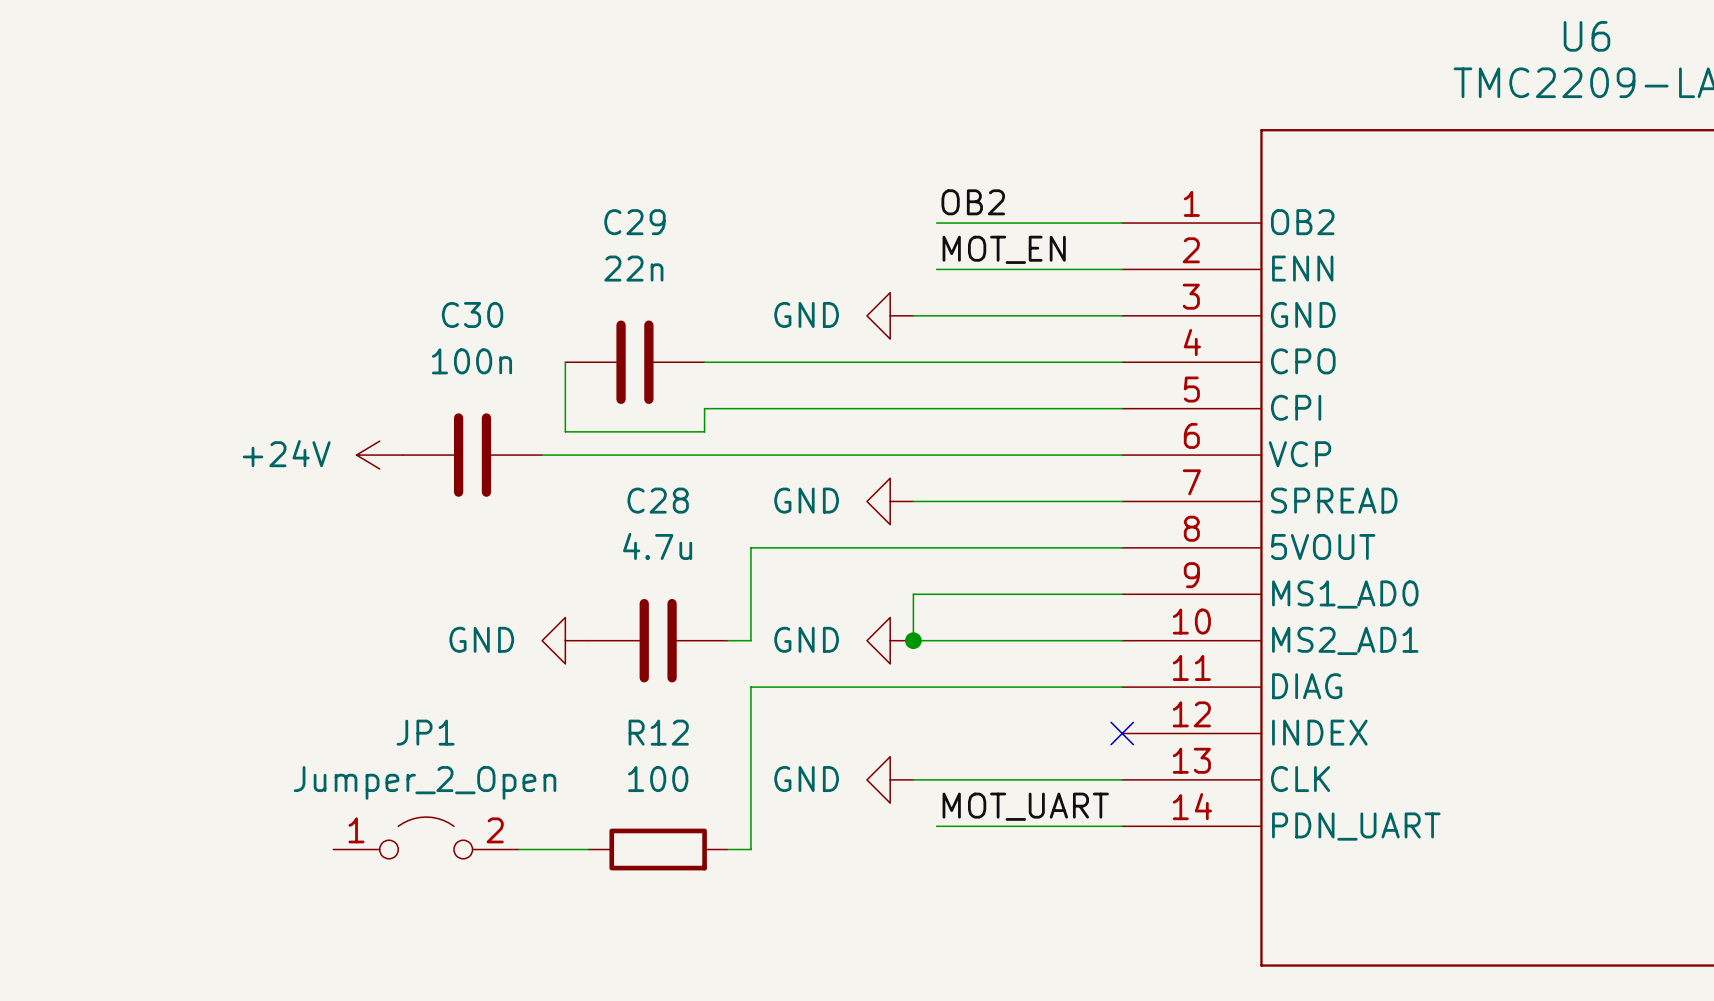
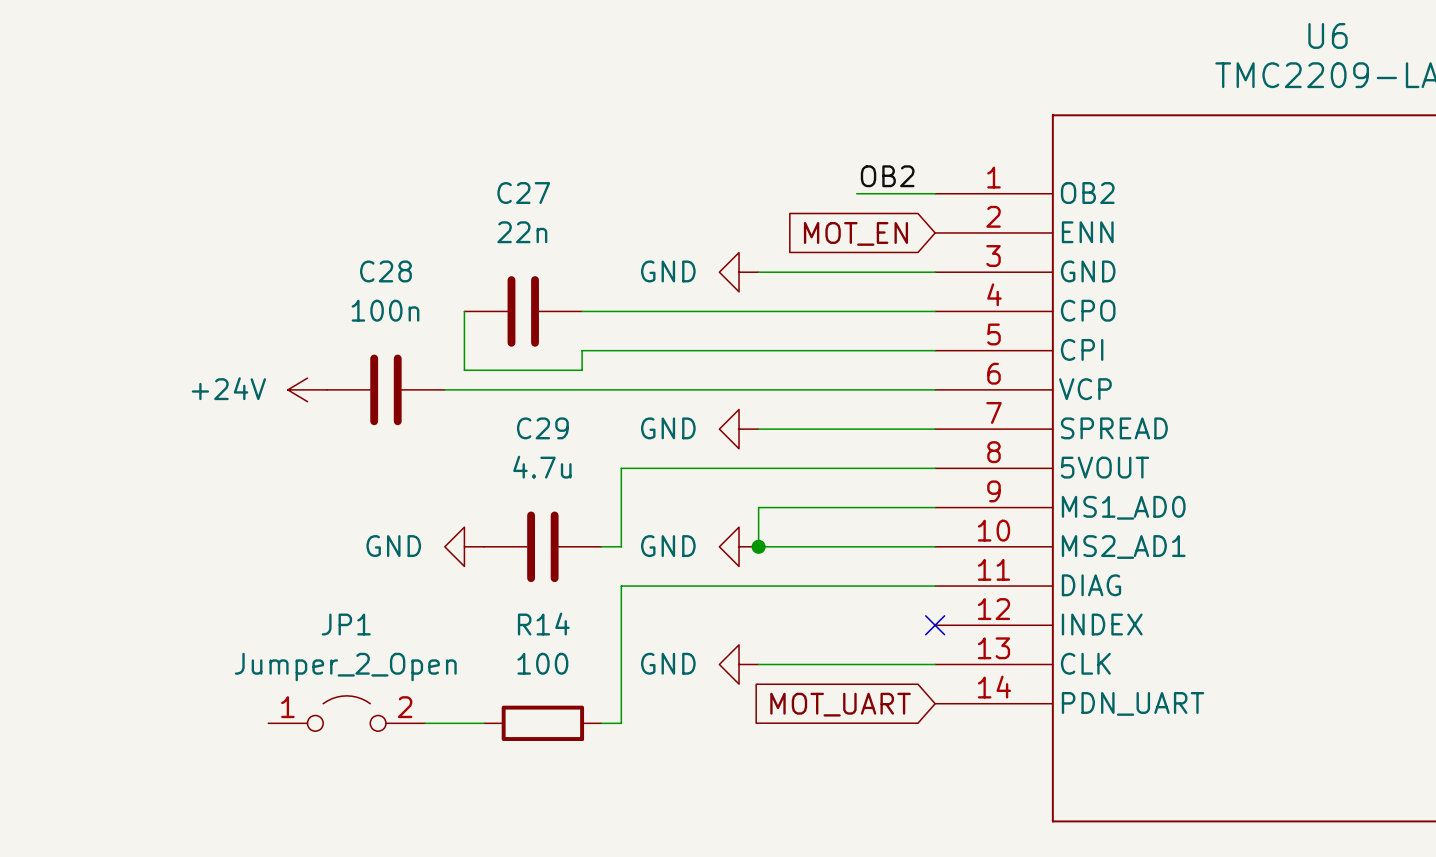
label position: OB2 (973, 202) -> OB2 (887, 176)
C29 name: C29 (634, 222) -> C27 (523, 193)
wire: (936, 223) (1029, 223) -> none
label: MOT_EN (1004, 249) -> none
wire: (936, 269) (1122, 269) -> none
global label: none -> MOT_EN (855, 233)
C30 name: C30 (472, 314) -> C28 (385, 271)
C28 name: C28 (658, 500) -> C29 (542, 428)
R12 name: R12 (658, 732) -> R14 (543, 624)
label: MOT_UART (1025, 806) -> none
wire: (936, 826) (1122, 826) -> none
global label: none -> MOT_UART (840, 704)

